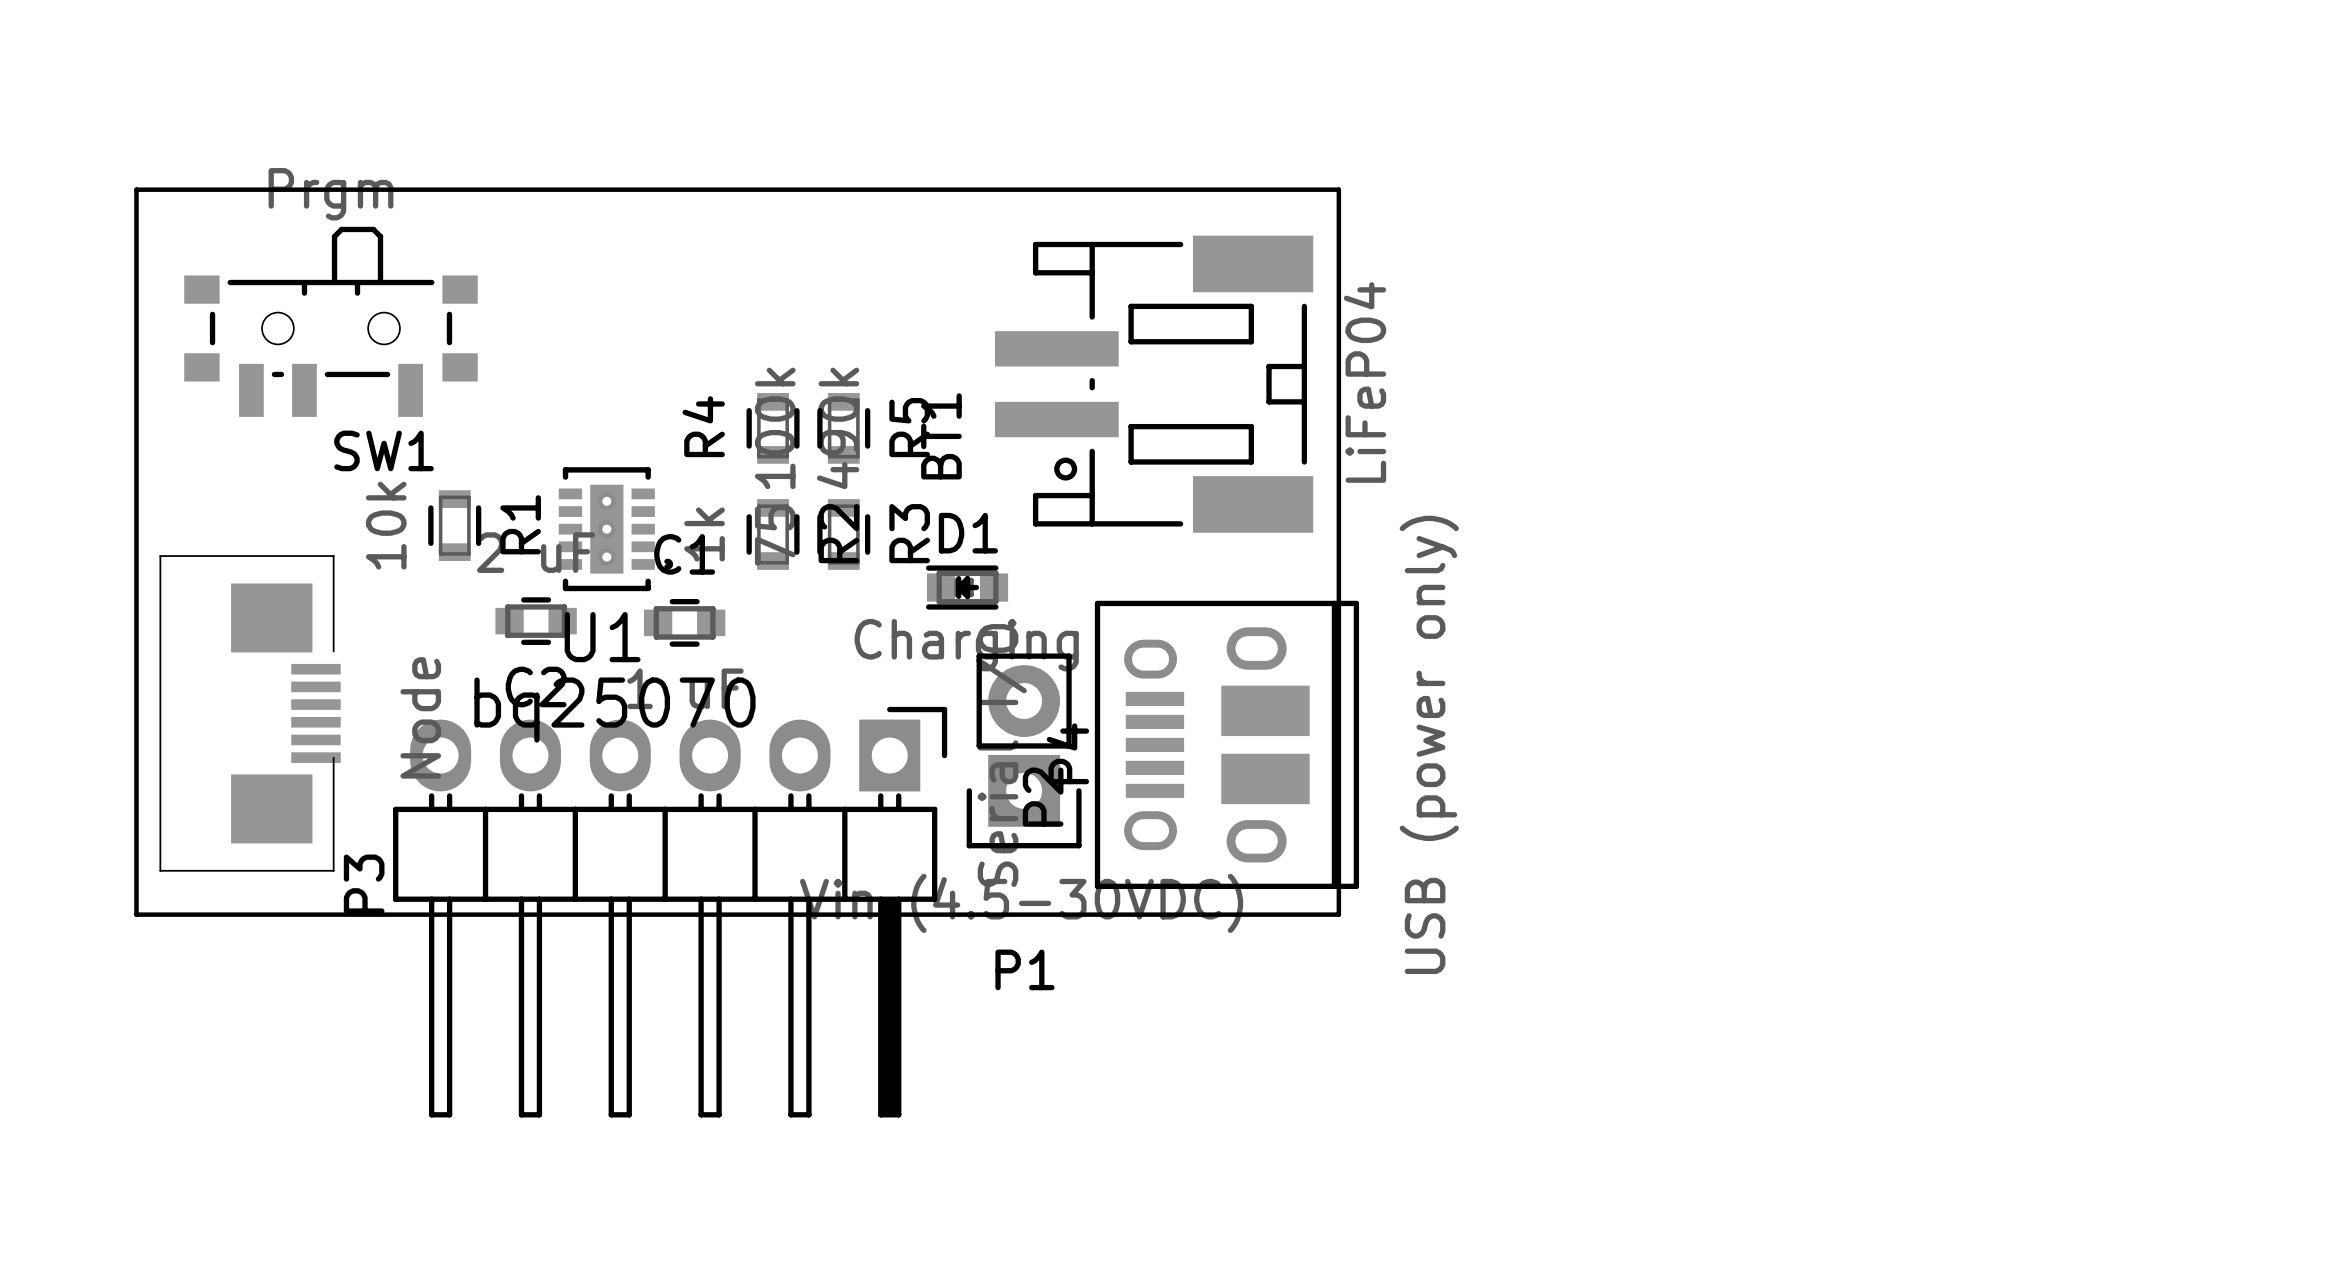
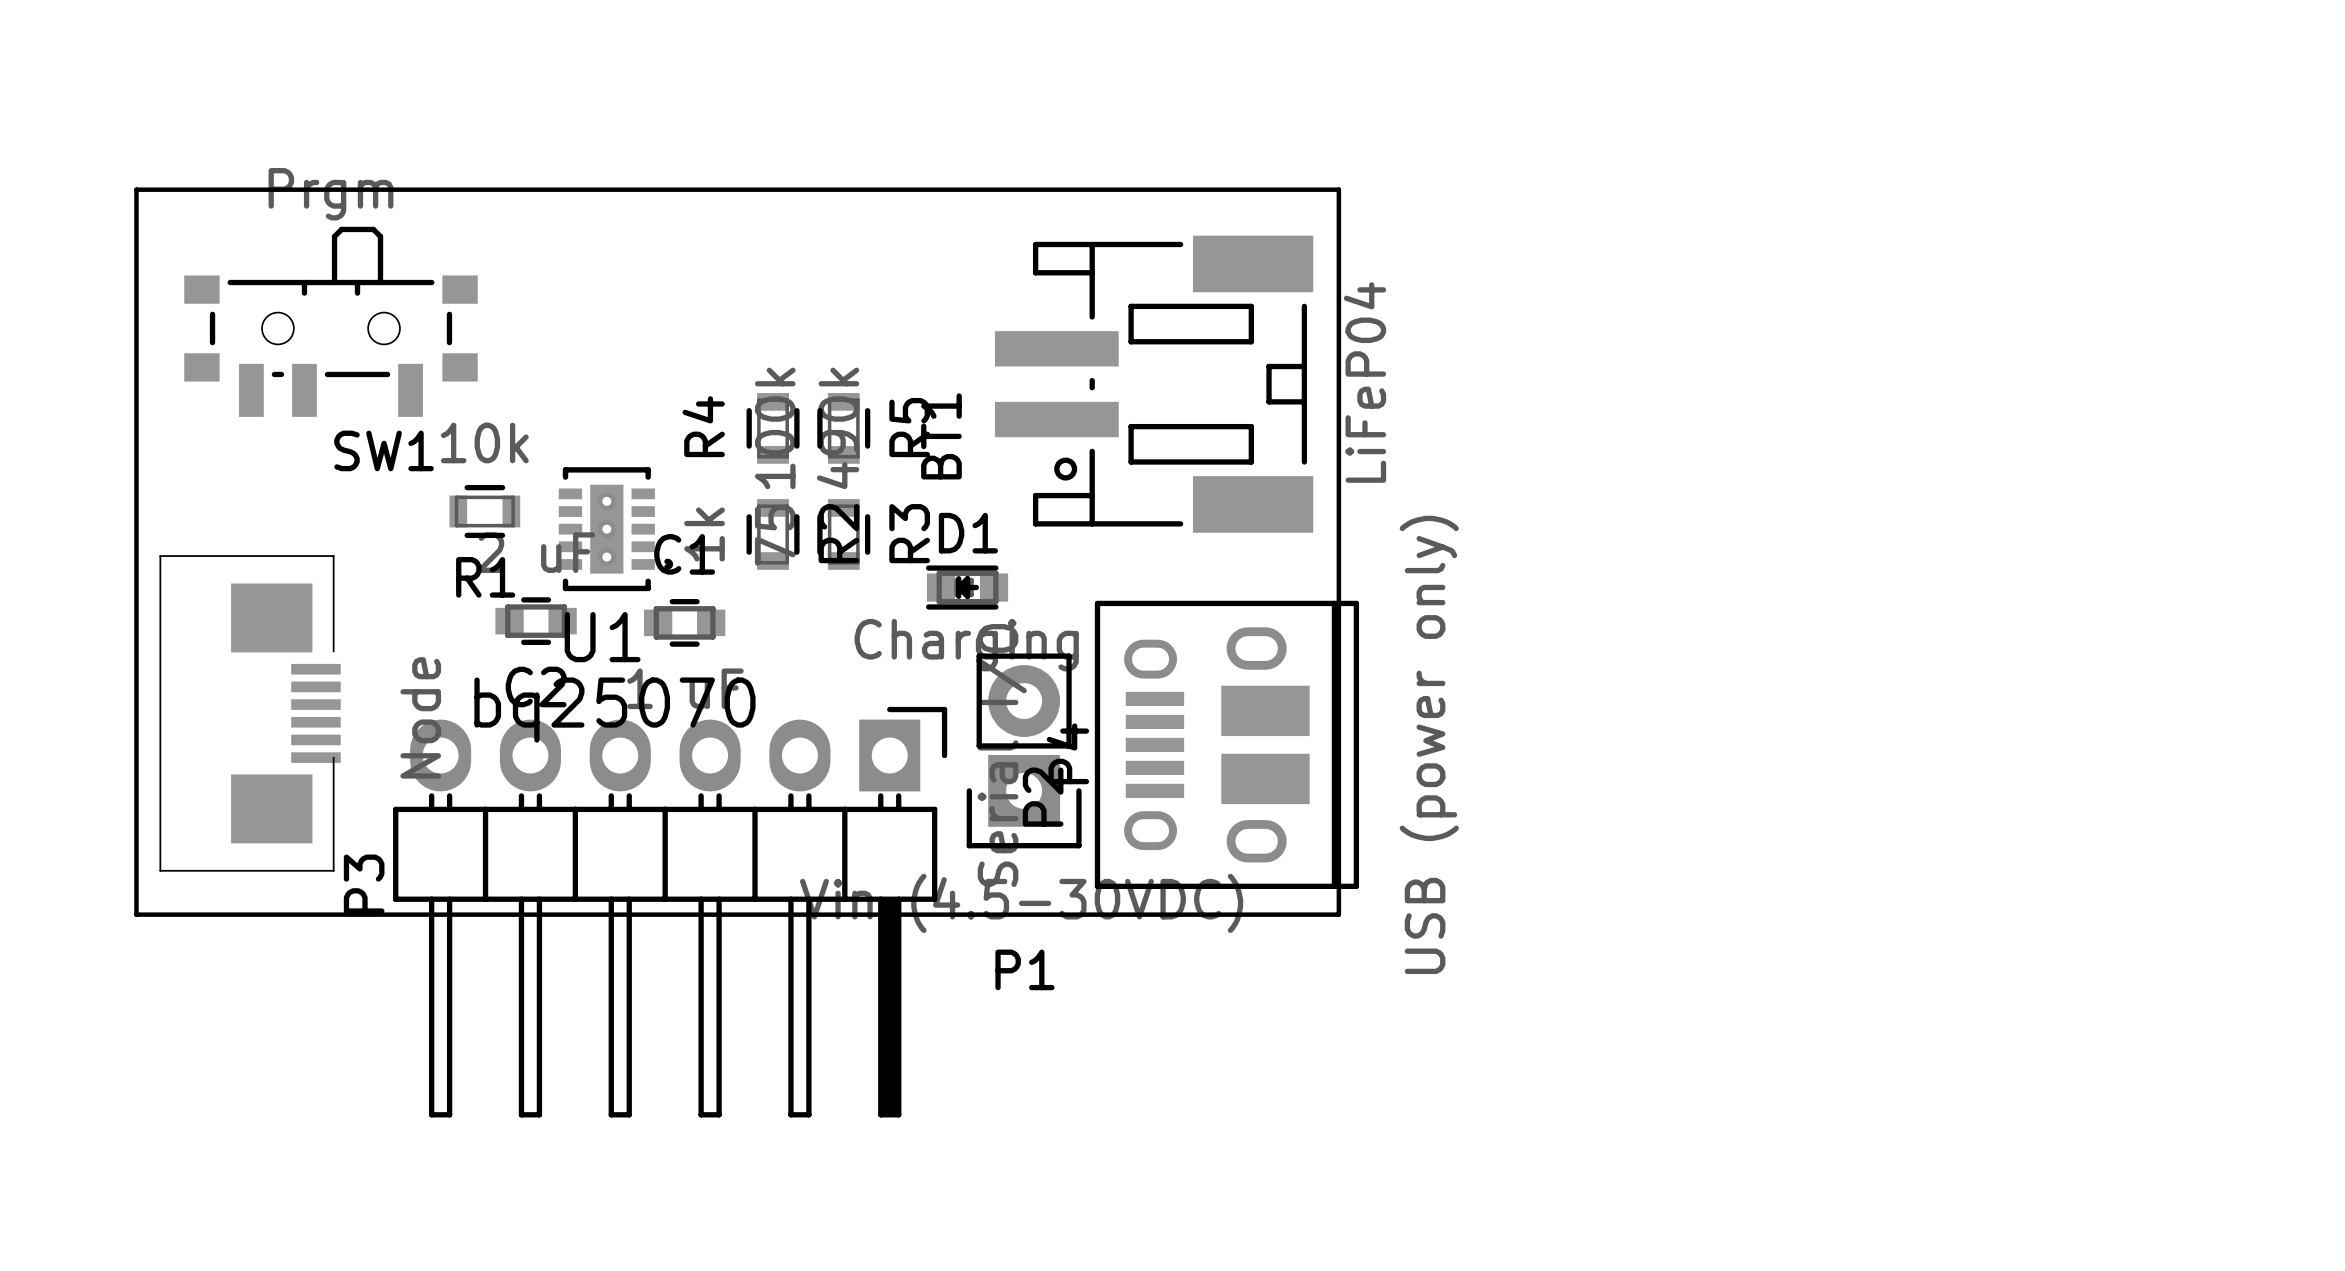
R1 rotation: 0° (454, 525) -> 90° clockwise (484, 511)

